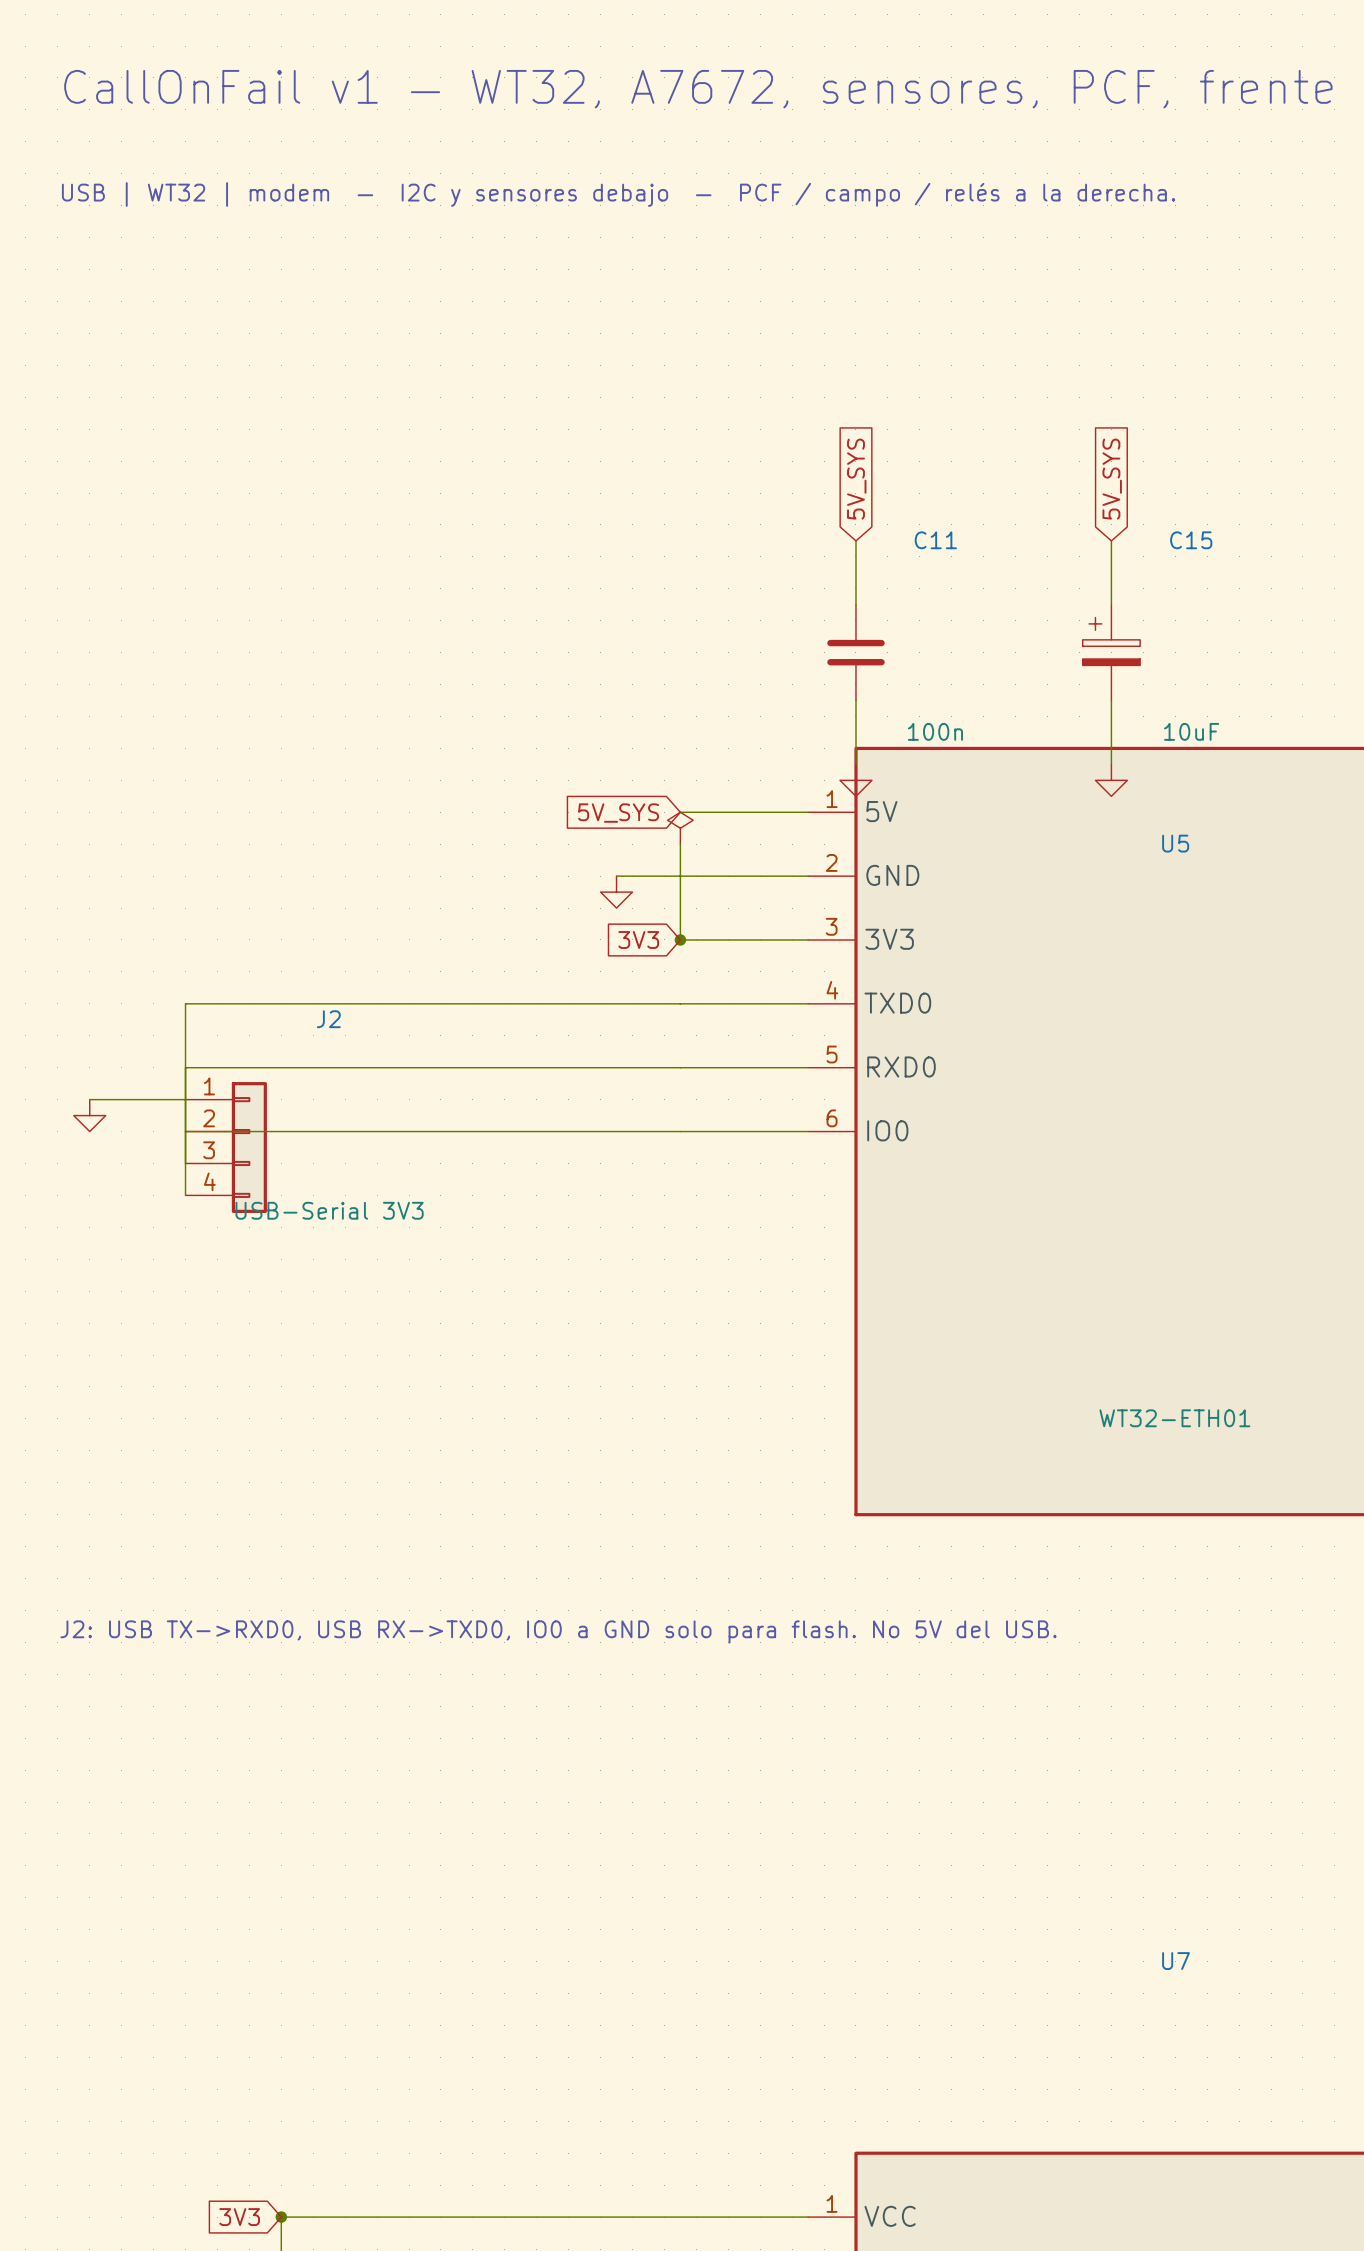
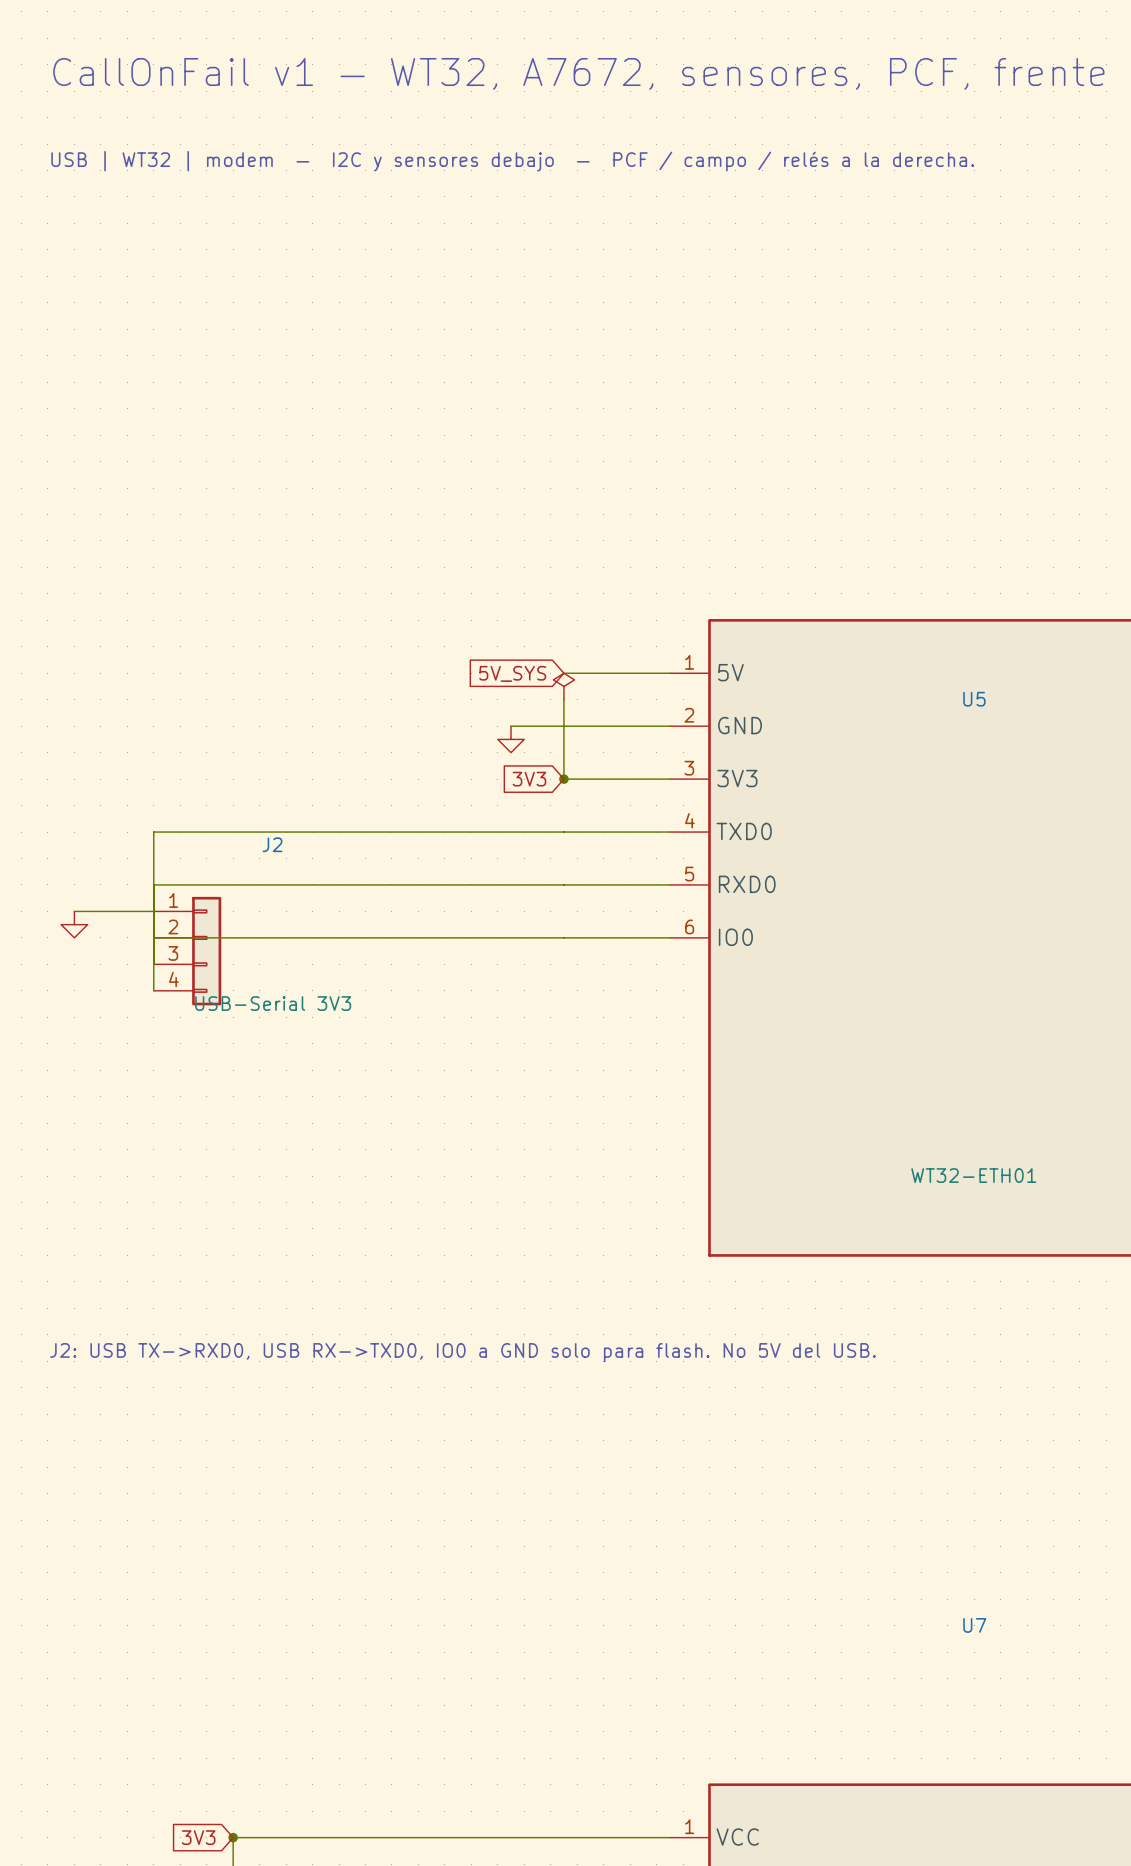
global label: 5V_SYS (856, 479) -> none
global label: 5V_SYS (1112, 479) -> none
wire: (855, 540) (855, 604) -> none
wire: (1111, 540) (1111, 604) -> none
C11: 100n (855, 652) -> none
C15: 10uF (1111, 652) -> none
wire: (855, 700) (855, 764) -> none
wire: (1111, 700) (1111, 764) -> none
power symbol: (855, 780) -> none
power symbol: (1111, 780) -> none

